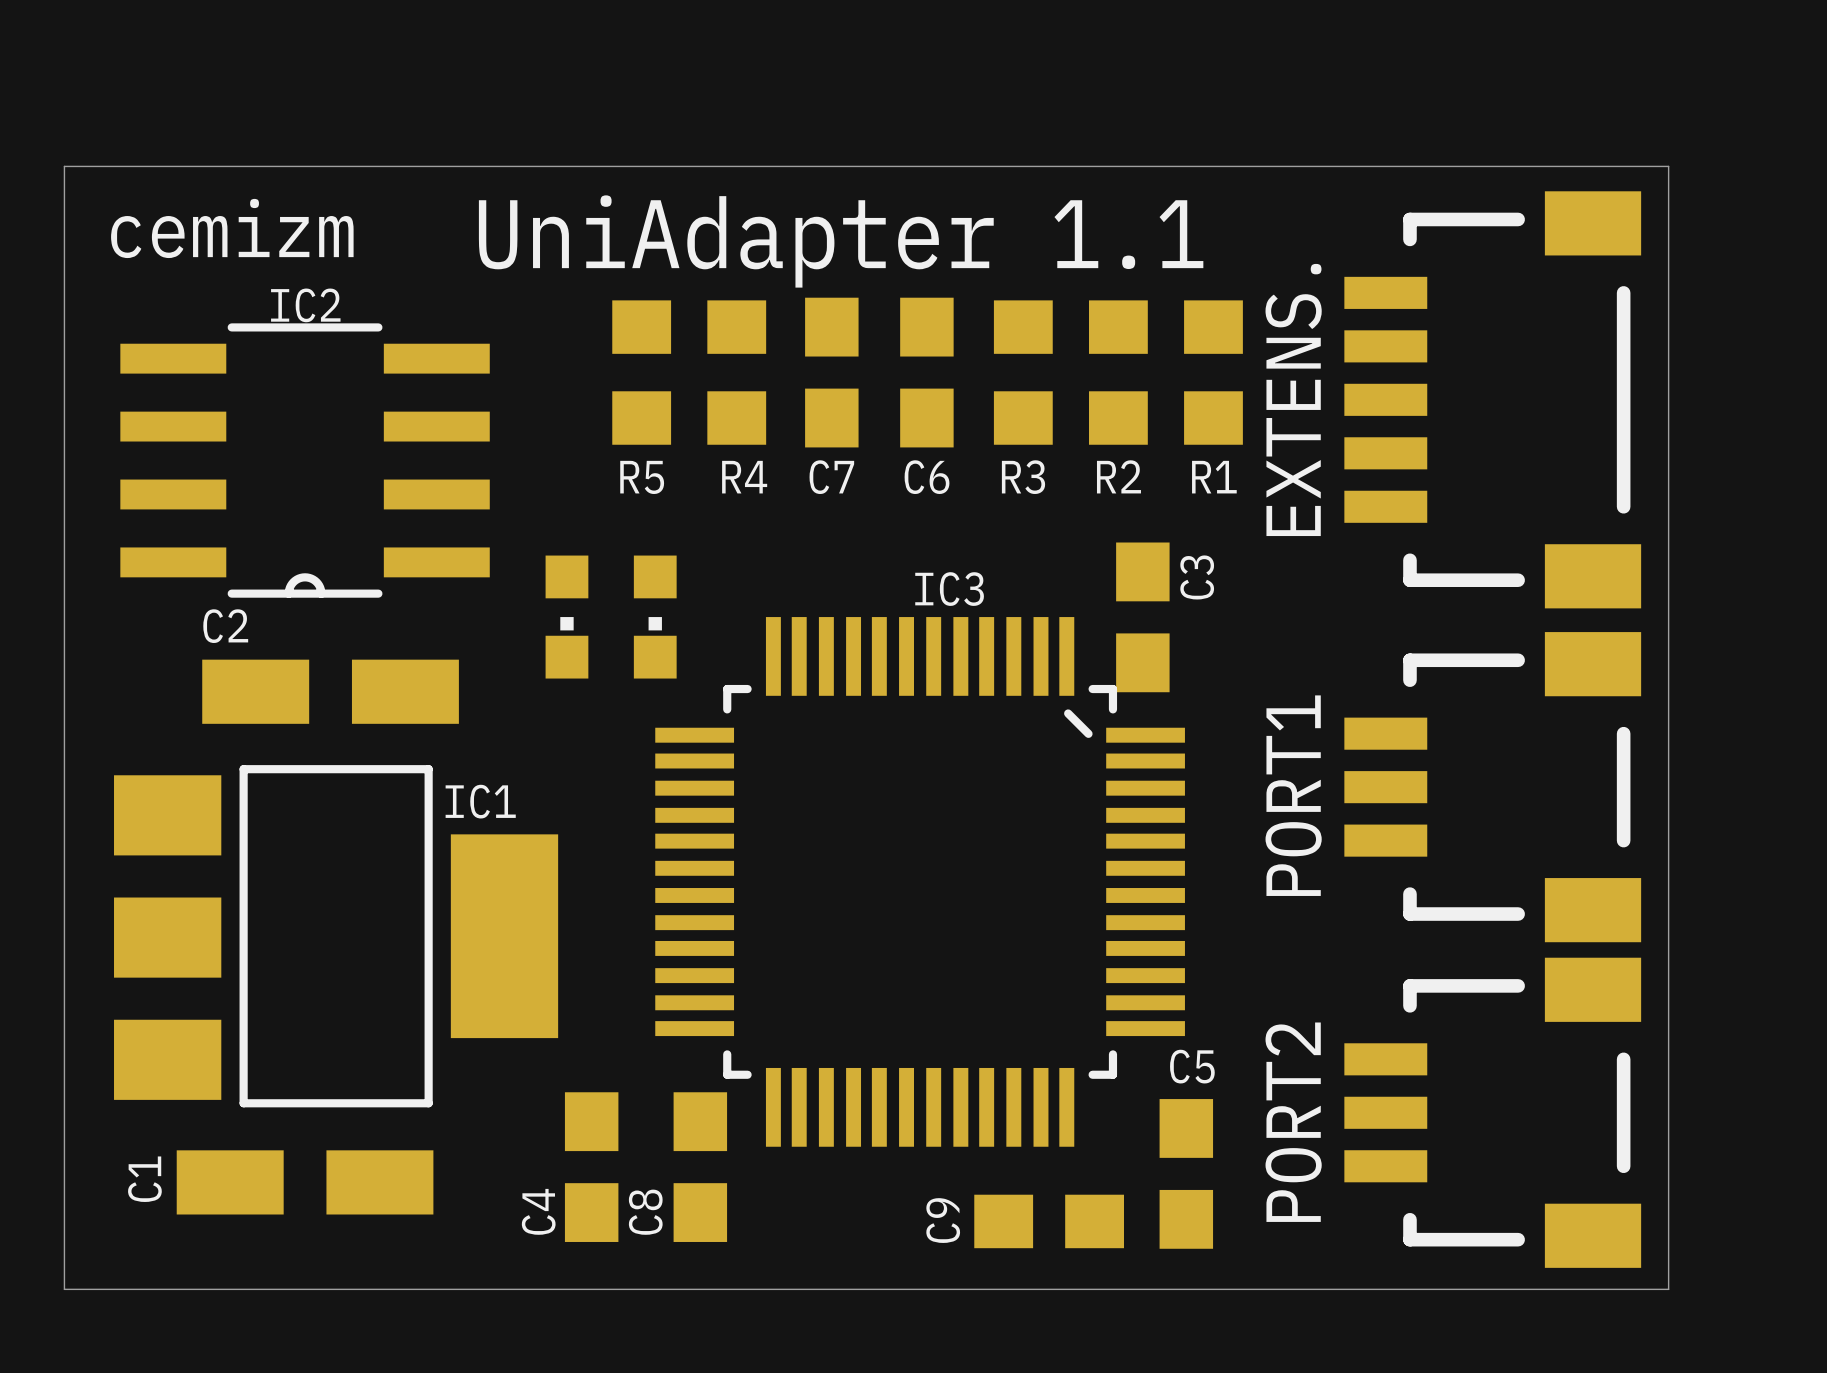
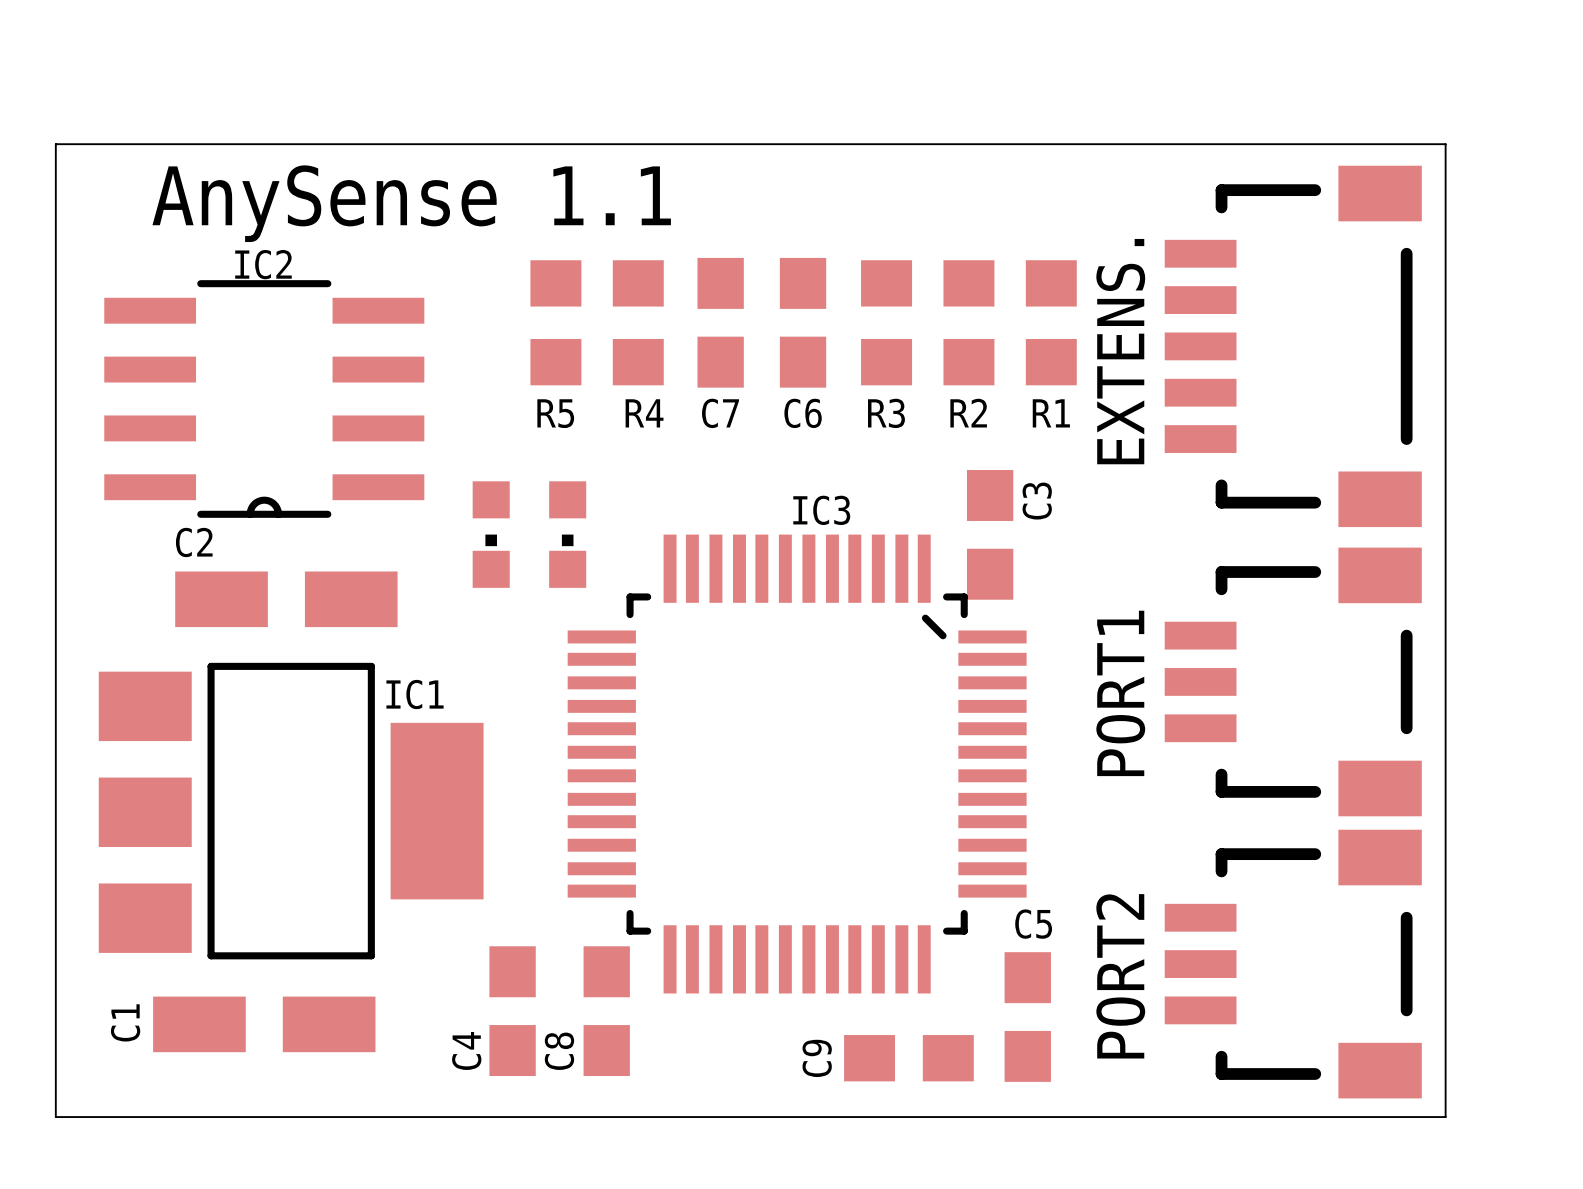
text: cemizm (232, 228) -> none
text: none -> AnySense 1.1 (411, 203)
text: UniAdapter 1.1 (841, 241) -> none

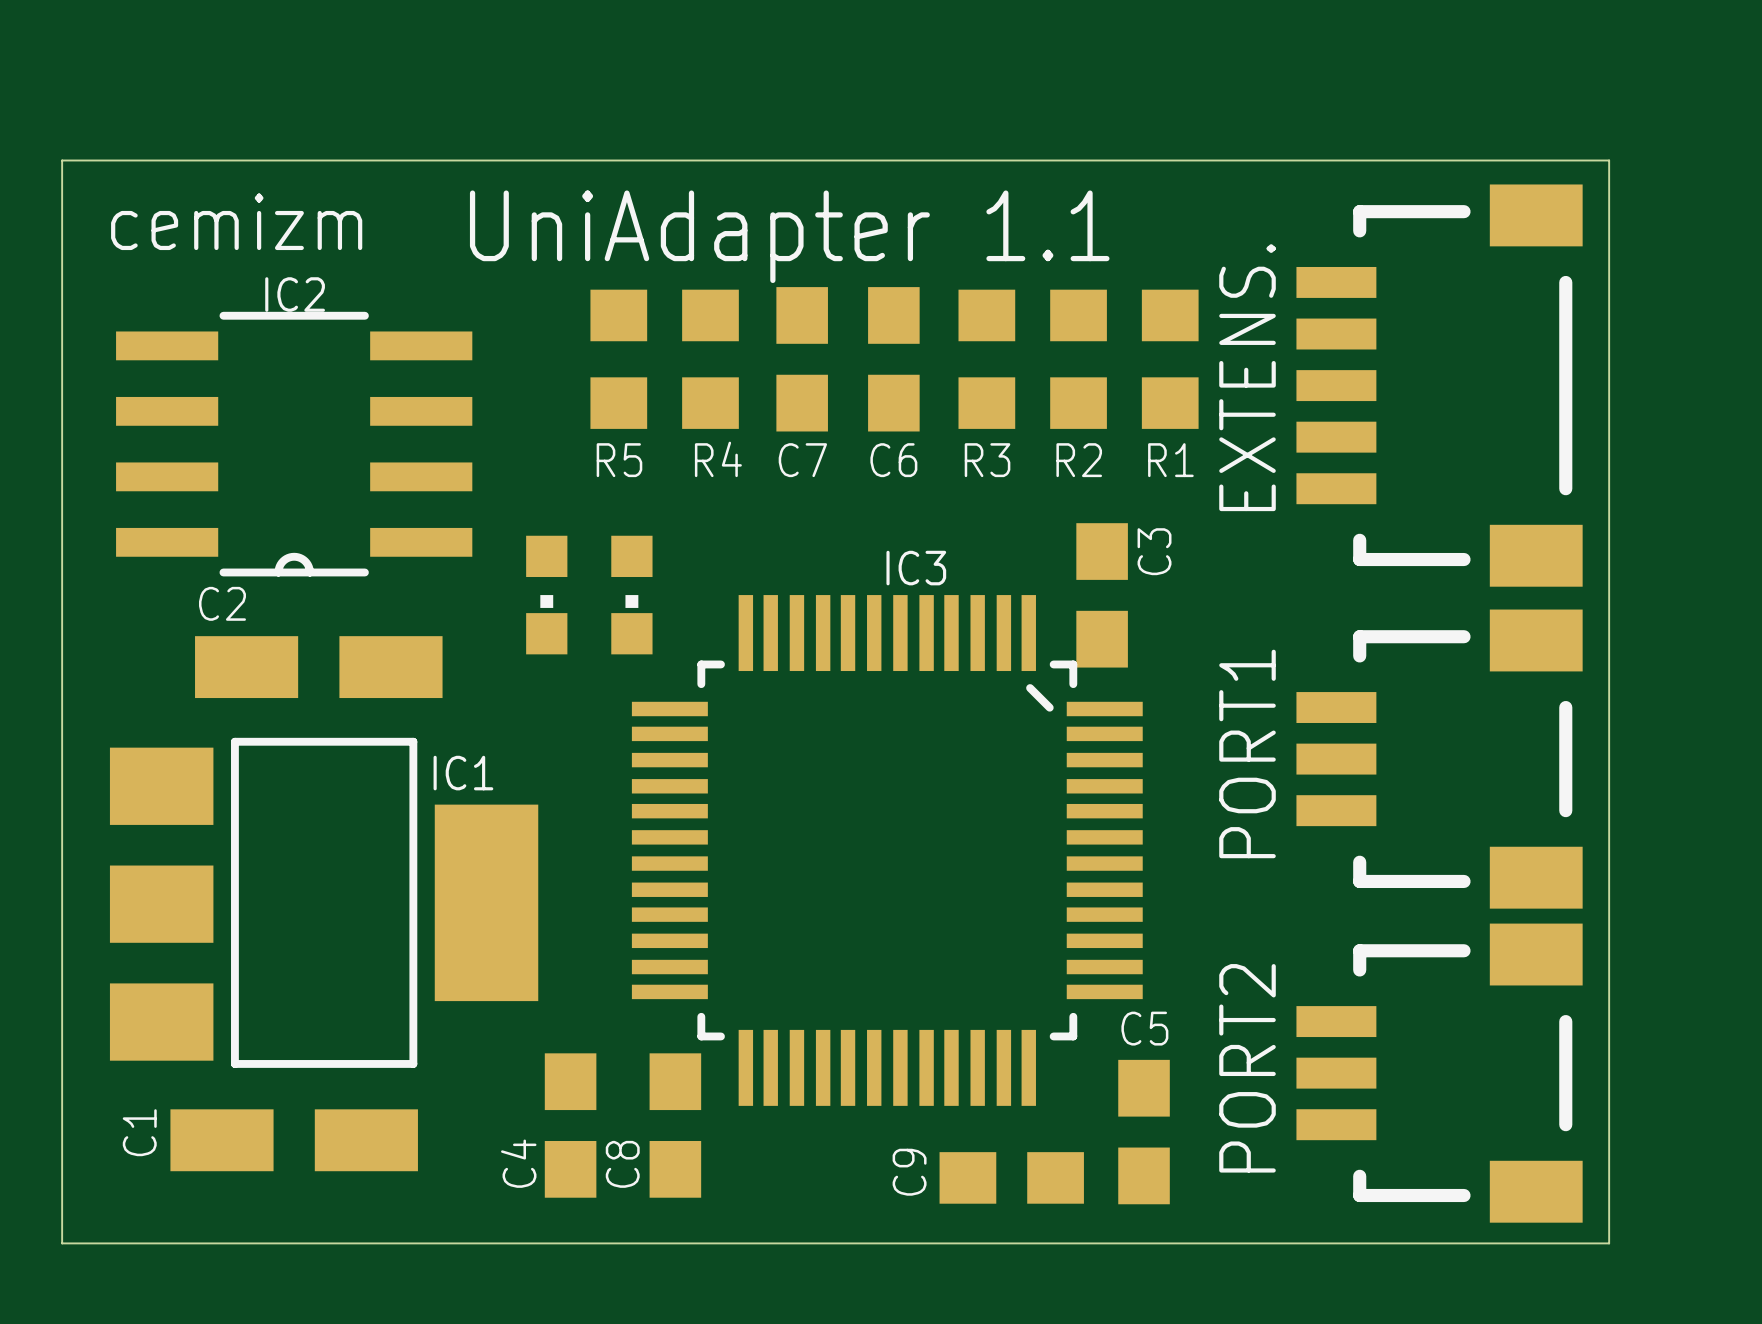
text: none -> cemizm (236, 221)
text: AnySense 1.1 (411, 203) -> none
text: none -> UniAdapter 1.1 (789, 236)

